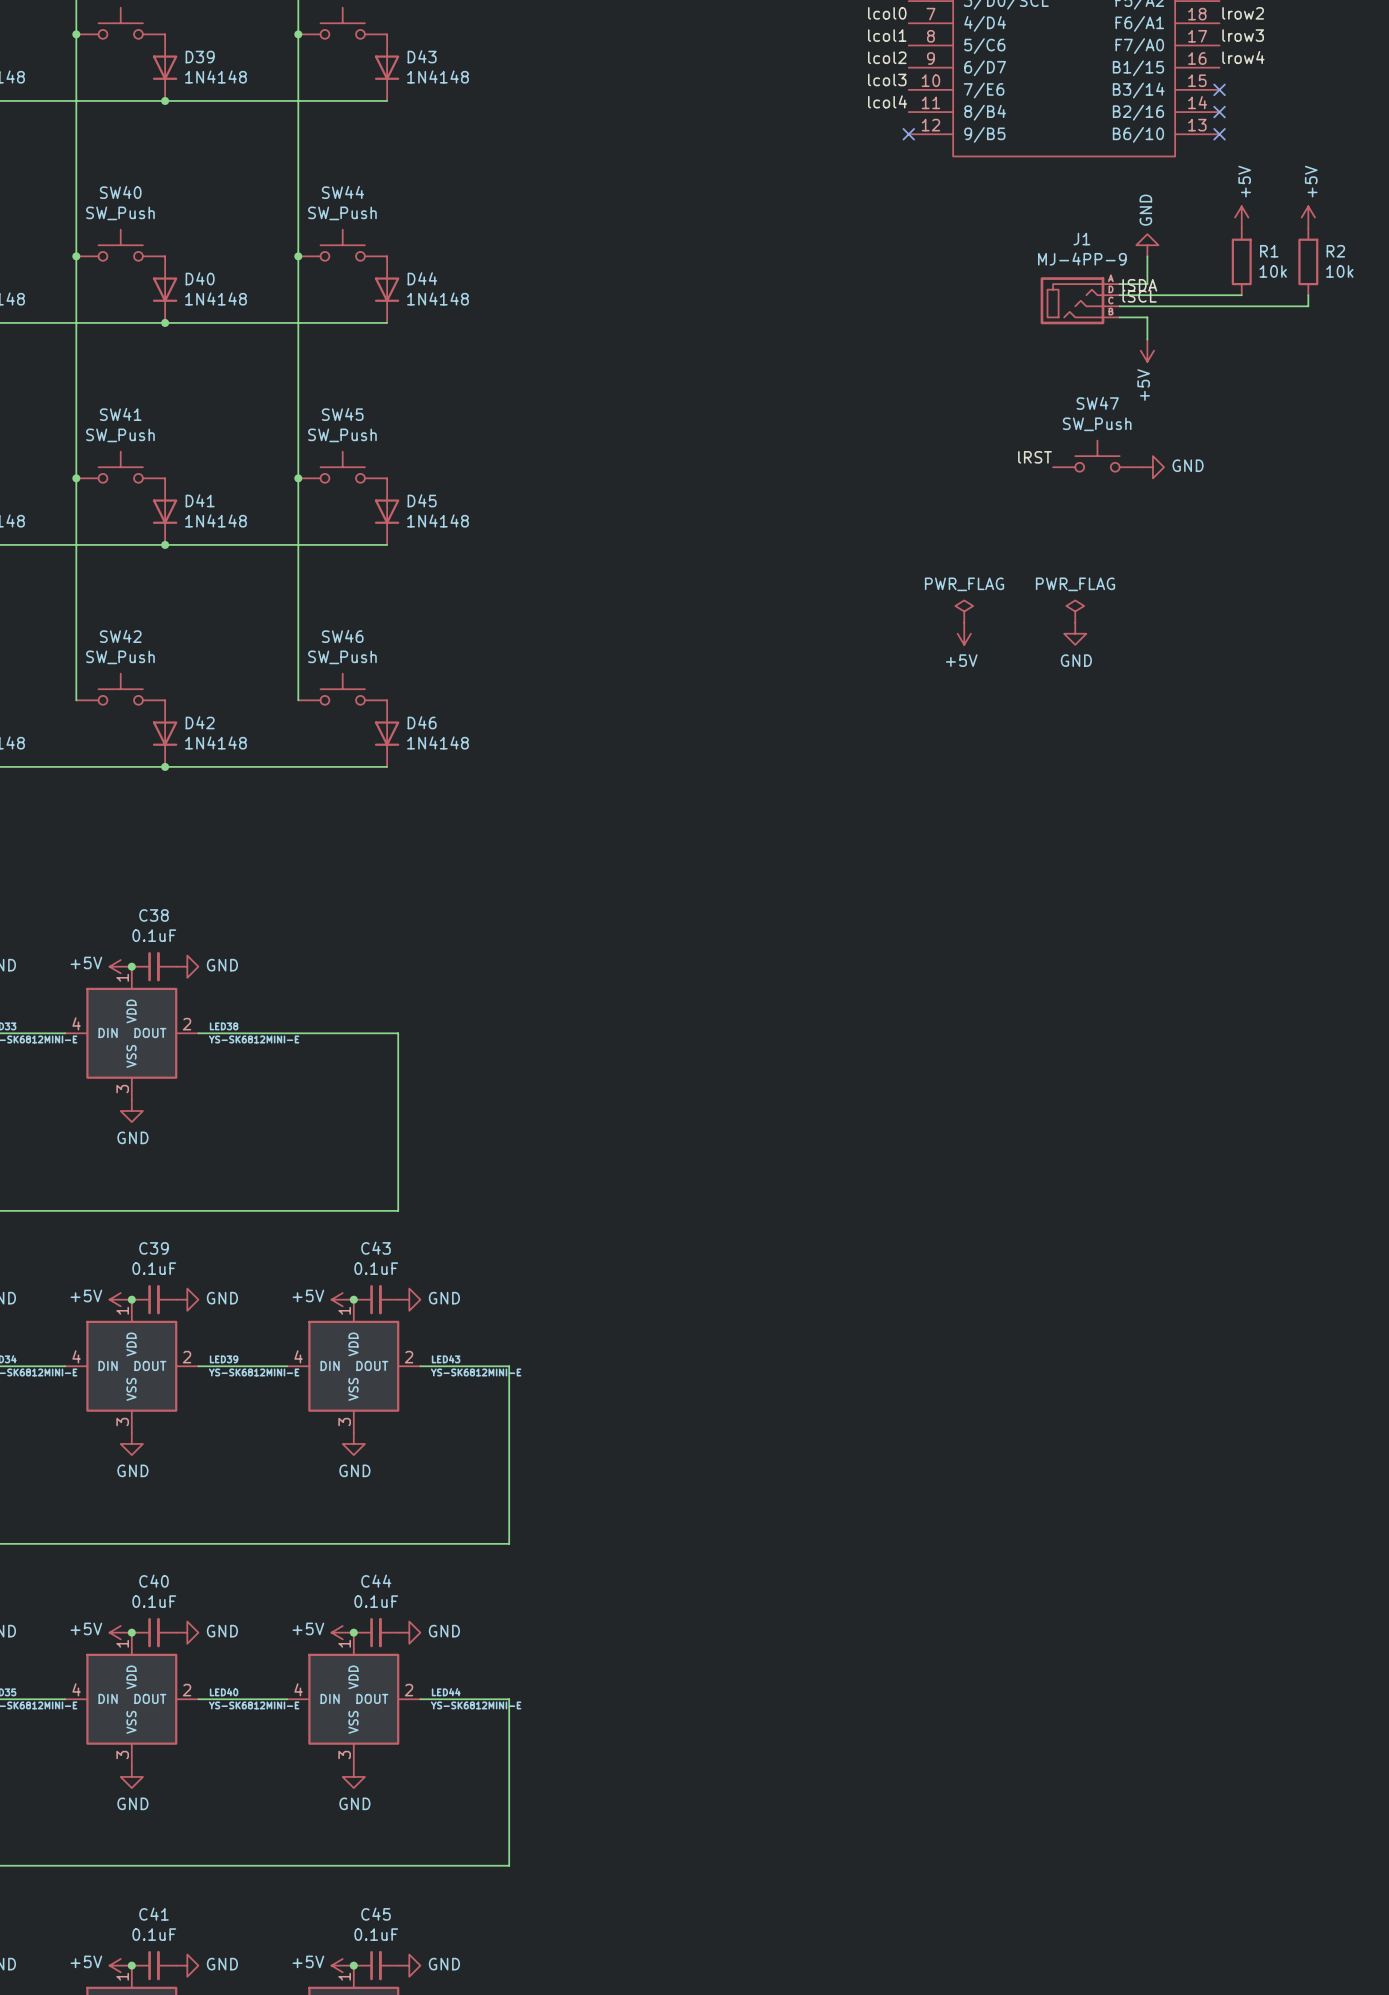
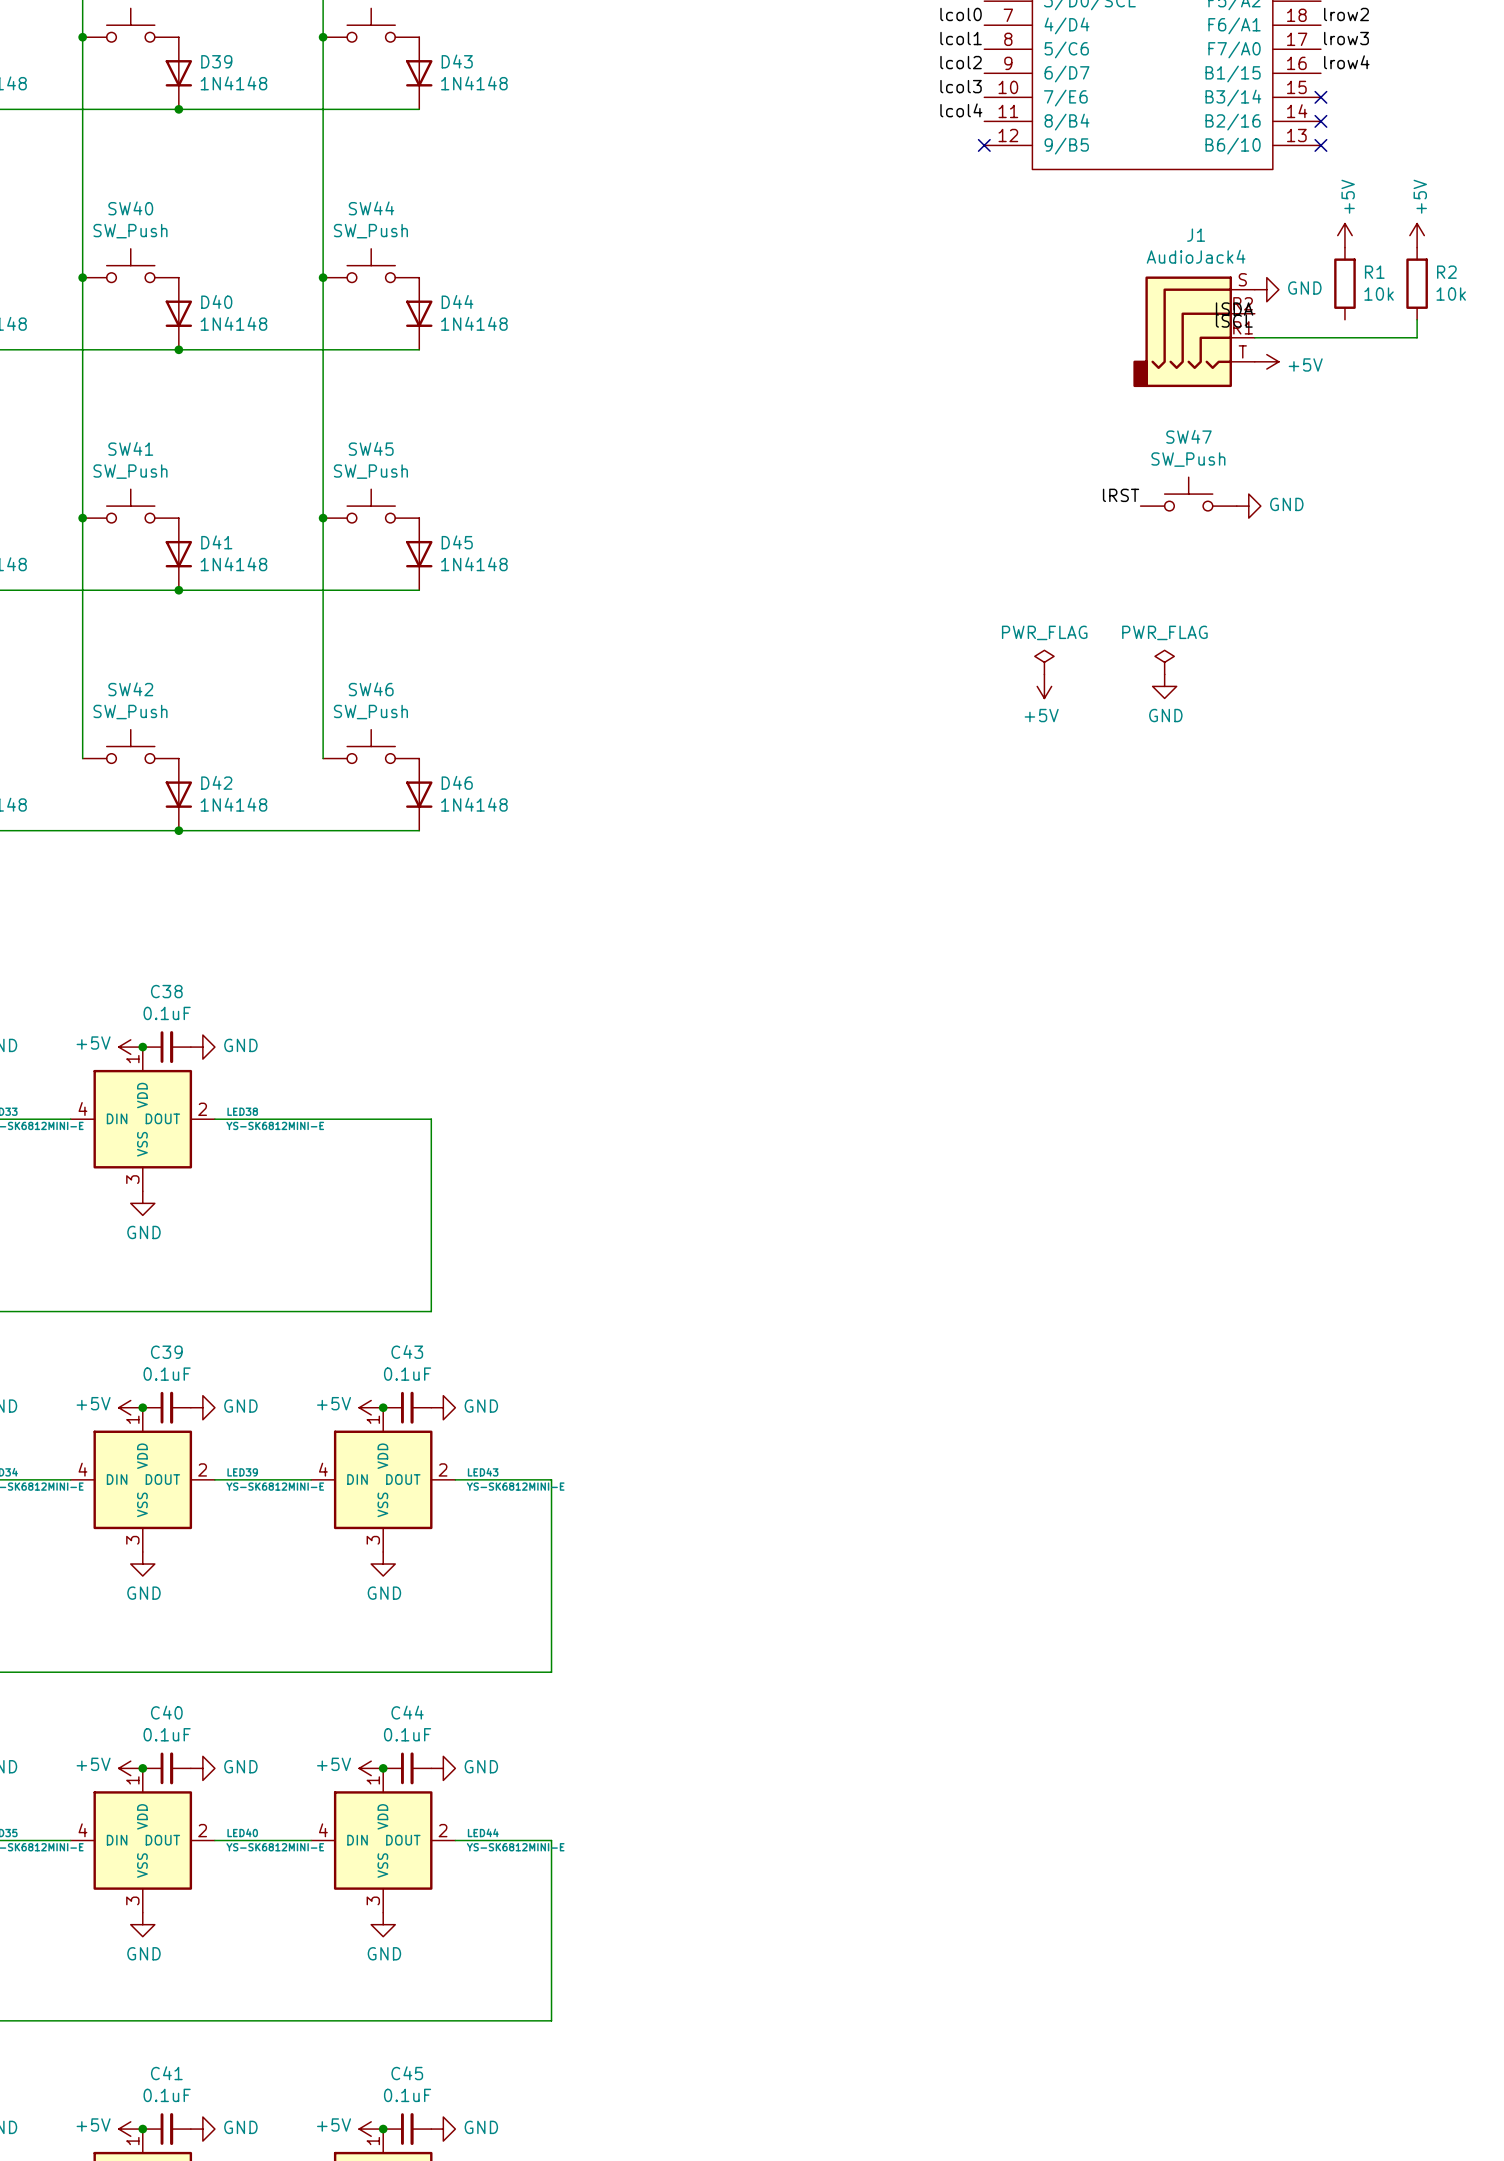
J1 name position: J1 (1081, 239) -> J1 (1196, 235)
power symbol rotation: 0° (1147, 245) -> 90° clockwise (1266, 289)
power symbol position: GND (1147, 245) -> GND (1266, 289)
wire: (1147, 256) (1147, 284) (1119, 284) -> none
J1 value: MJ-4PP-9 (1082, 259) -> AudioJack4 (1196, 256)
J1 symbol: [1040, 277, 1120, 325] -> [1133, 276, 1255, 388]
wire: (1119, 295) (1241, 295) -> none
wire: (1119, 306) (1308, 306) -> (1254, 337) (1417, 337) (1417, 331)
power symbol rotation: 0° (1147, 350) -> 90° counterclockwise (1266, 361)
power symbol position: +5V (1147, 350) -> +5V (1266, 361)

